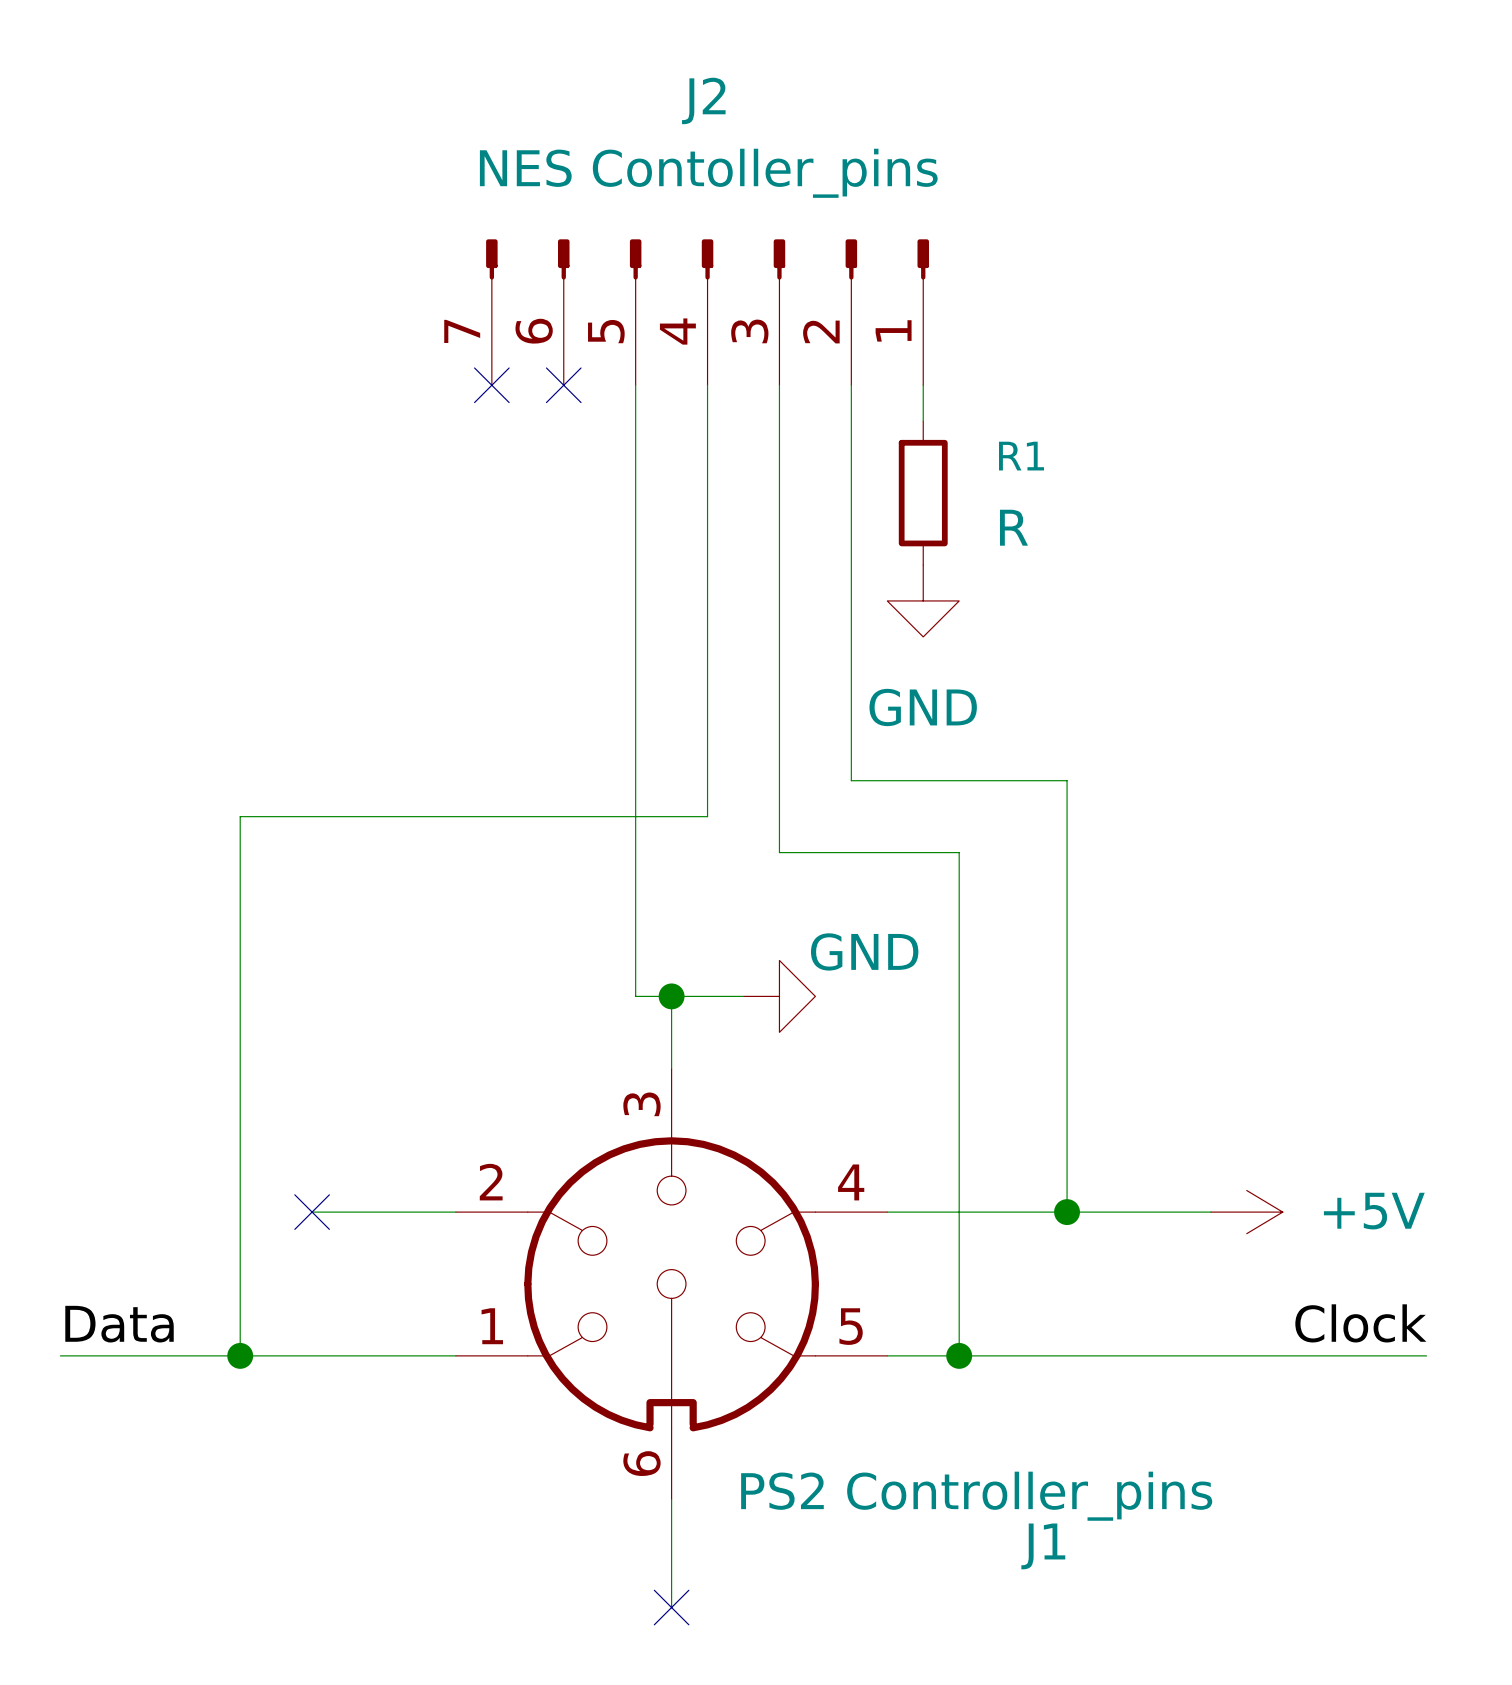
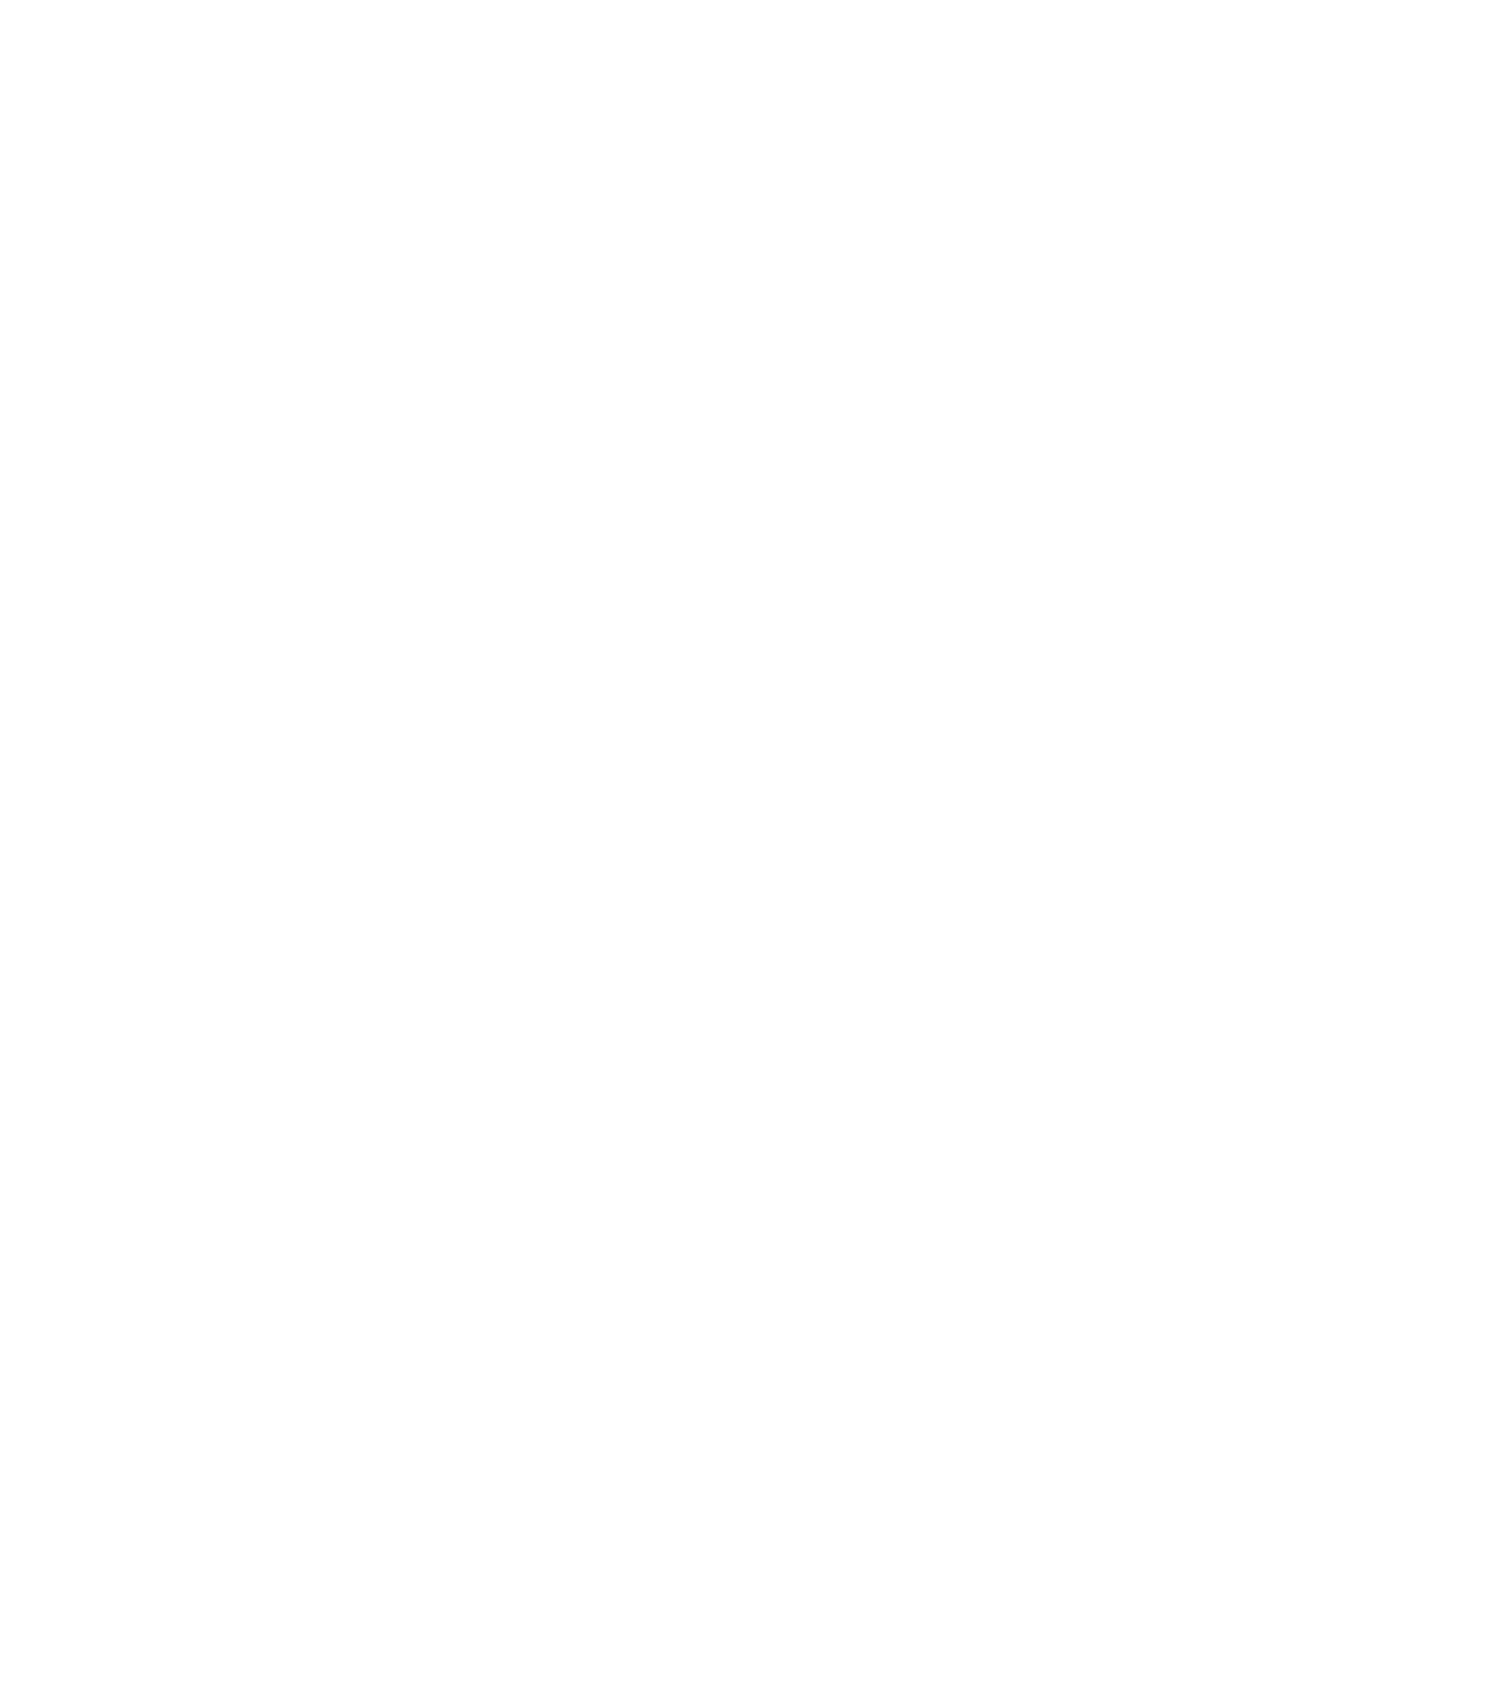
J2: NES Contoller_pins (707, 312) -> none
no-connect mark: (491, 385) -> none
no-connect mark: (563, 385) -> none
wire: (635, 385) (635, 996) (743, 996) -> none
wire: (707, 385) (707, 816) (240, 816) (240, 1355) -> none
wire: (779, 385) (779, 852) (959, 852) (959, 1355) -> none
wire: (851, 385) (851, 780) (1067, 780) (1067, 1212) -> none
wire: (923, 385) (923, 421) -> none
R1: R (923, 493) -> none
power symbol: GND (923, 600) -> none
wire: (671, 996) (671, 1068) -> none
junction: (671, 996) -> none
power symbol: GND (779, 996) -> none
wire: (312, 1212) (455, 1212) -> none
no-connect mark: (312, 1212) -> none
wire: (887, 1212) (1210, 1212) -> none
junction: (1067, 1212) -> none
power symbol: +5V (1246, 1212) -> none
J1: PS2 Controller_pins (671, 1283) -> none
label: Clock (1360, 1323) -> none
label: Data (119, 1324) -> none
wire: (60, 1355) (455, 1355) -> none
junction: (240, 1355) -> none
wire: (887, 1355) (1426, 1355) -> none
junction: (959, 1355) -> none
wire: (671, 1499) (671, 1607) -> none
no-connect mark: (671, 1607) -> none

